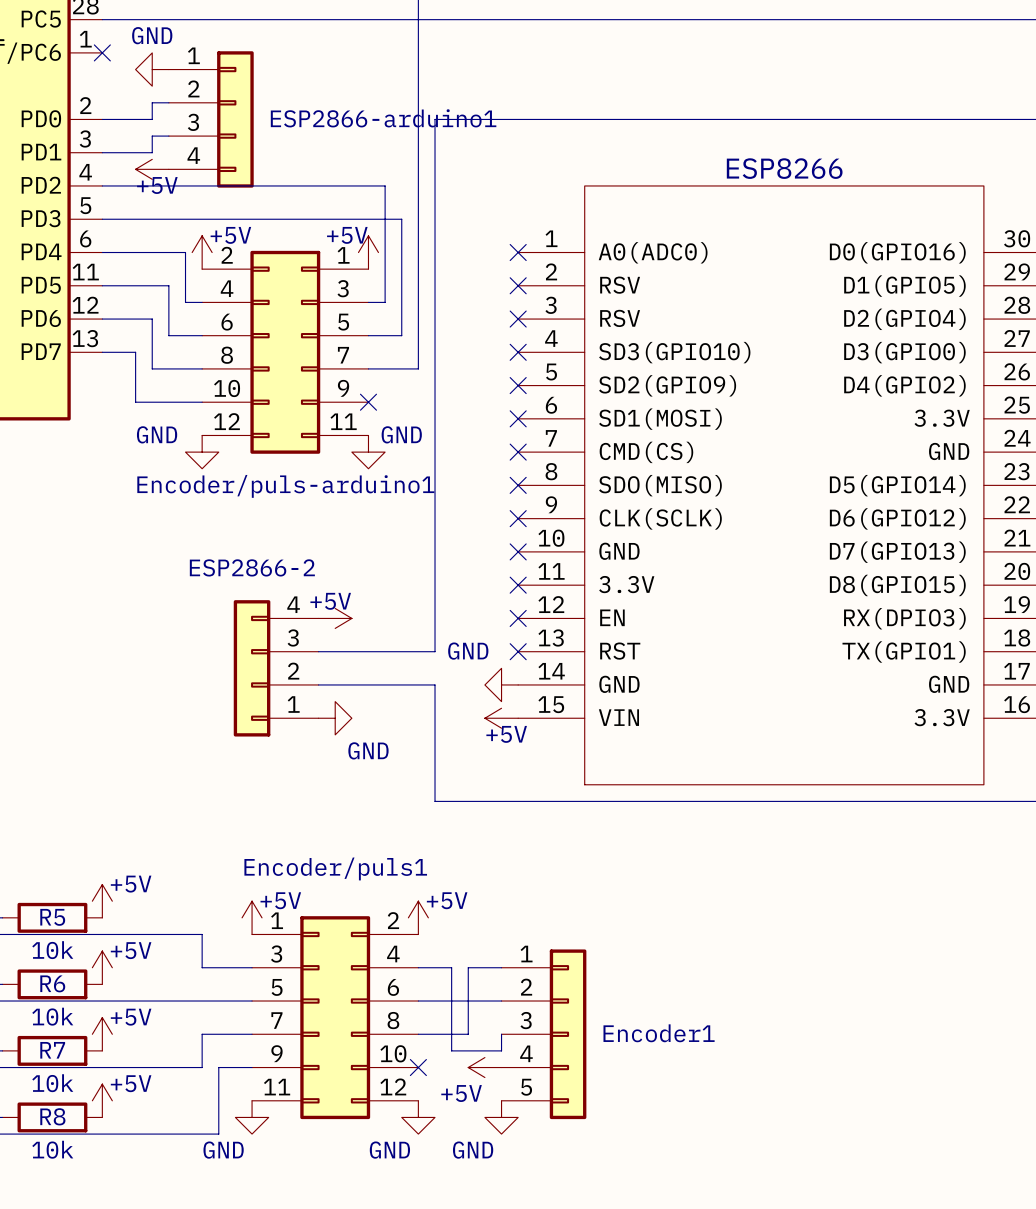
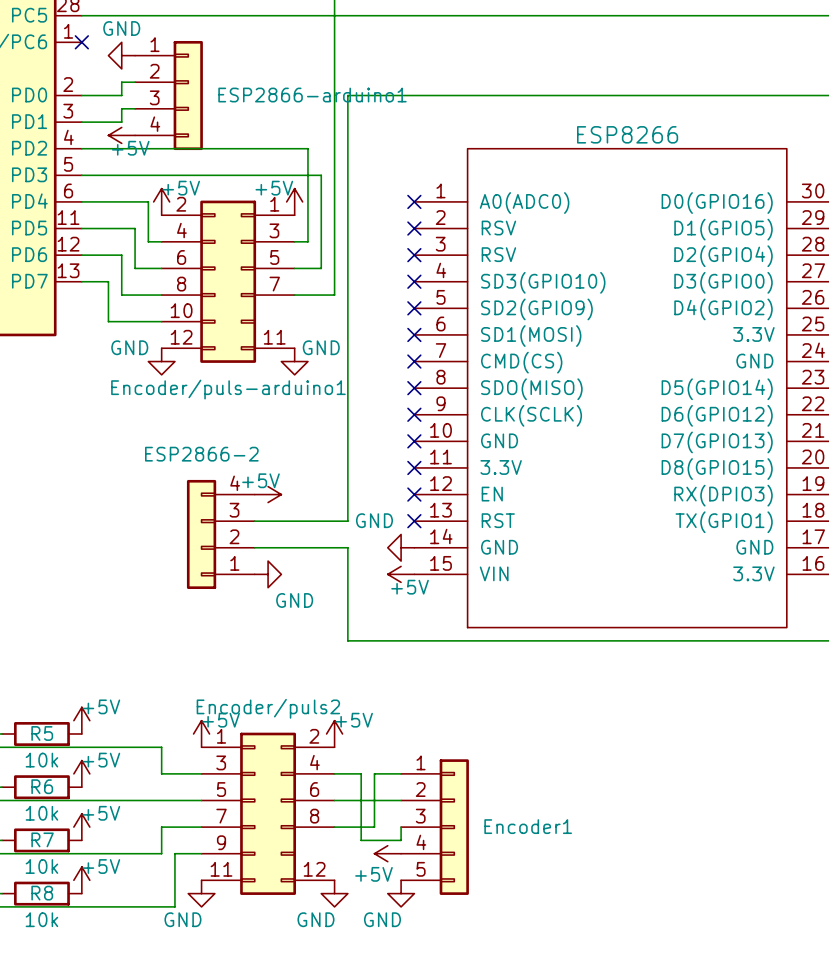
Encoder/puls-arduino1 symbol: [202, 250, 369, 454] -> [161, 200, 295, 363]
no-connect mark: (368, 402) -> none
Encoder/puls1: (335, 1017) -> none
Encoder/puls2: none -> (268, 813)
no-connect mark: (418, 1067) -> none

